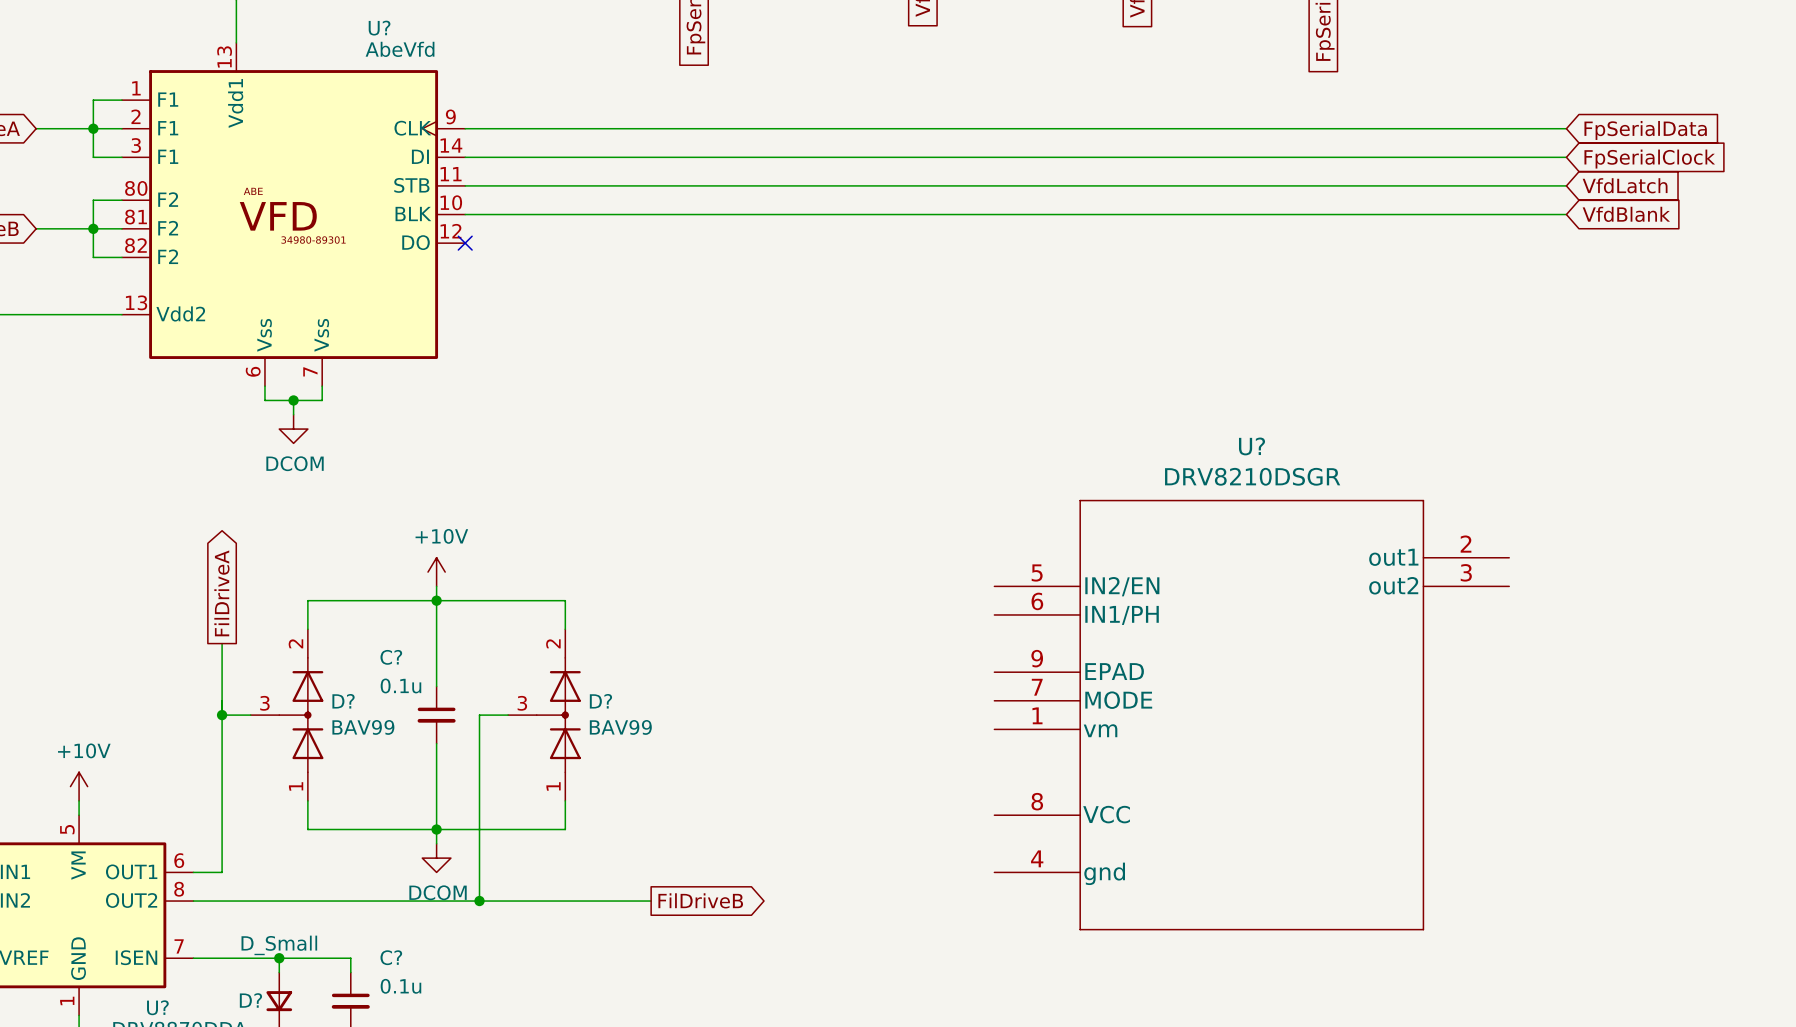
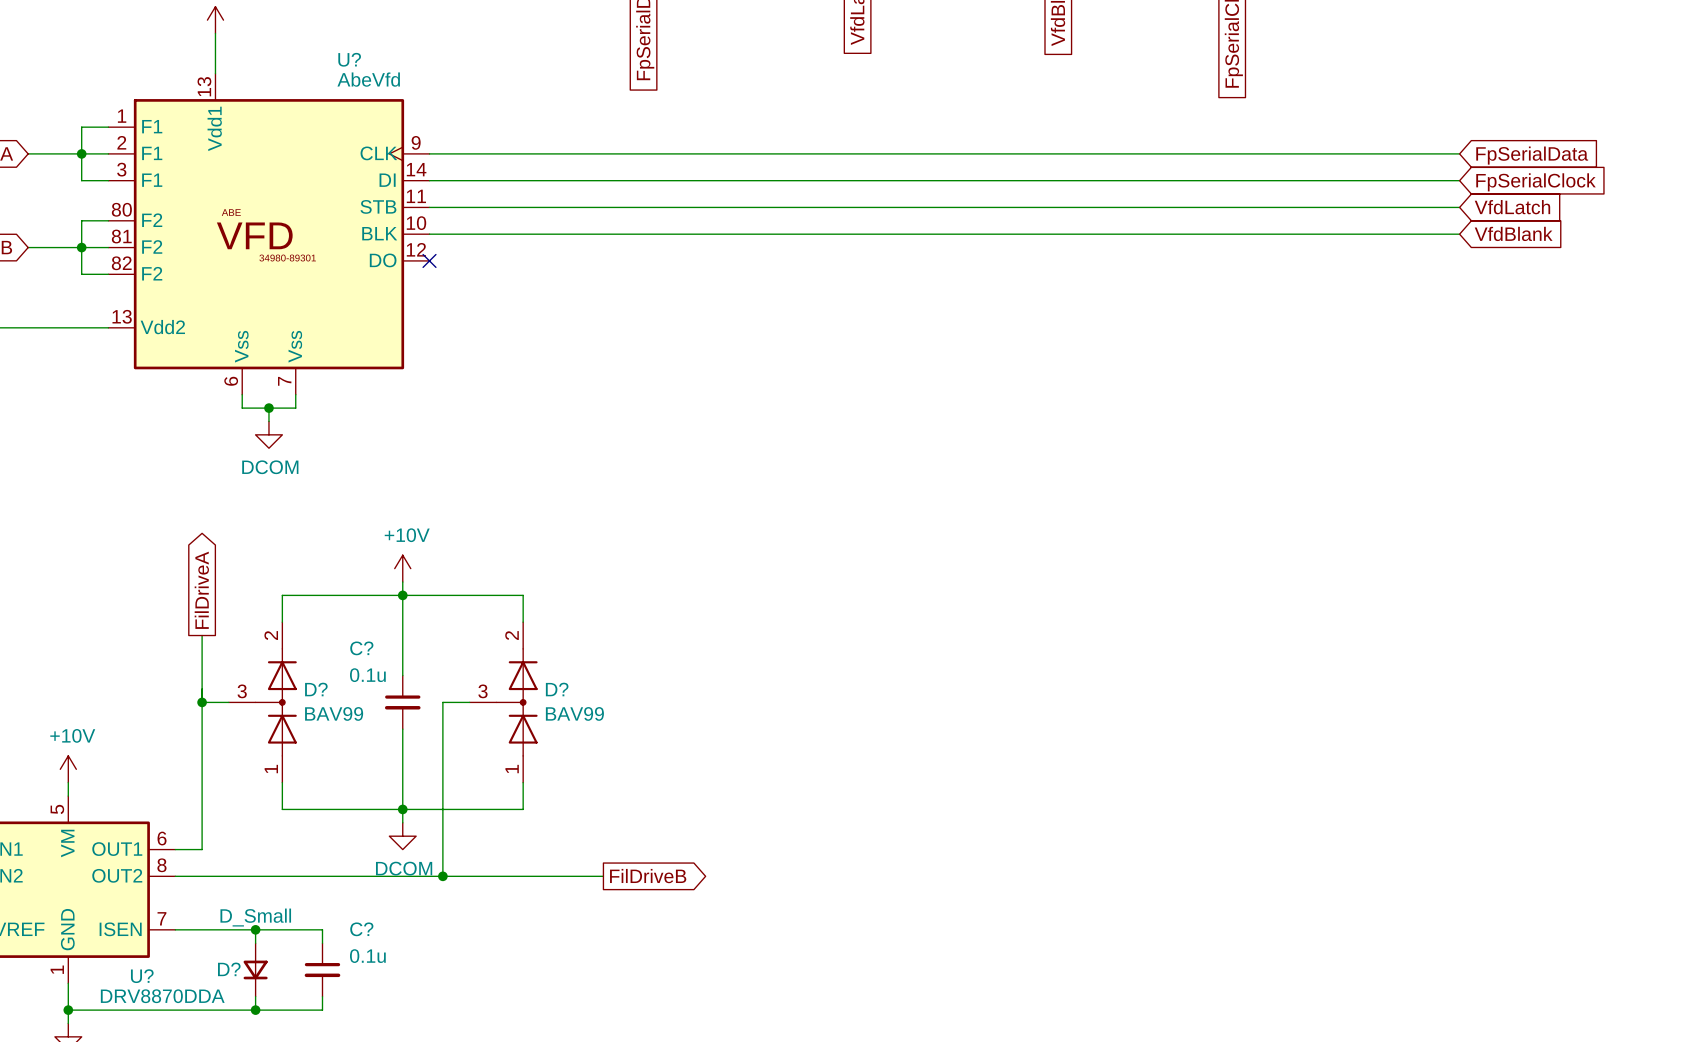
U?: DRV8210DSGR (1251, 715) -> none

